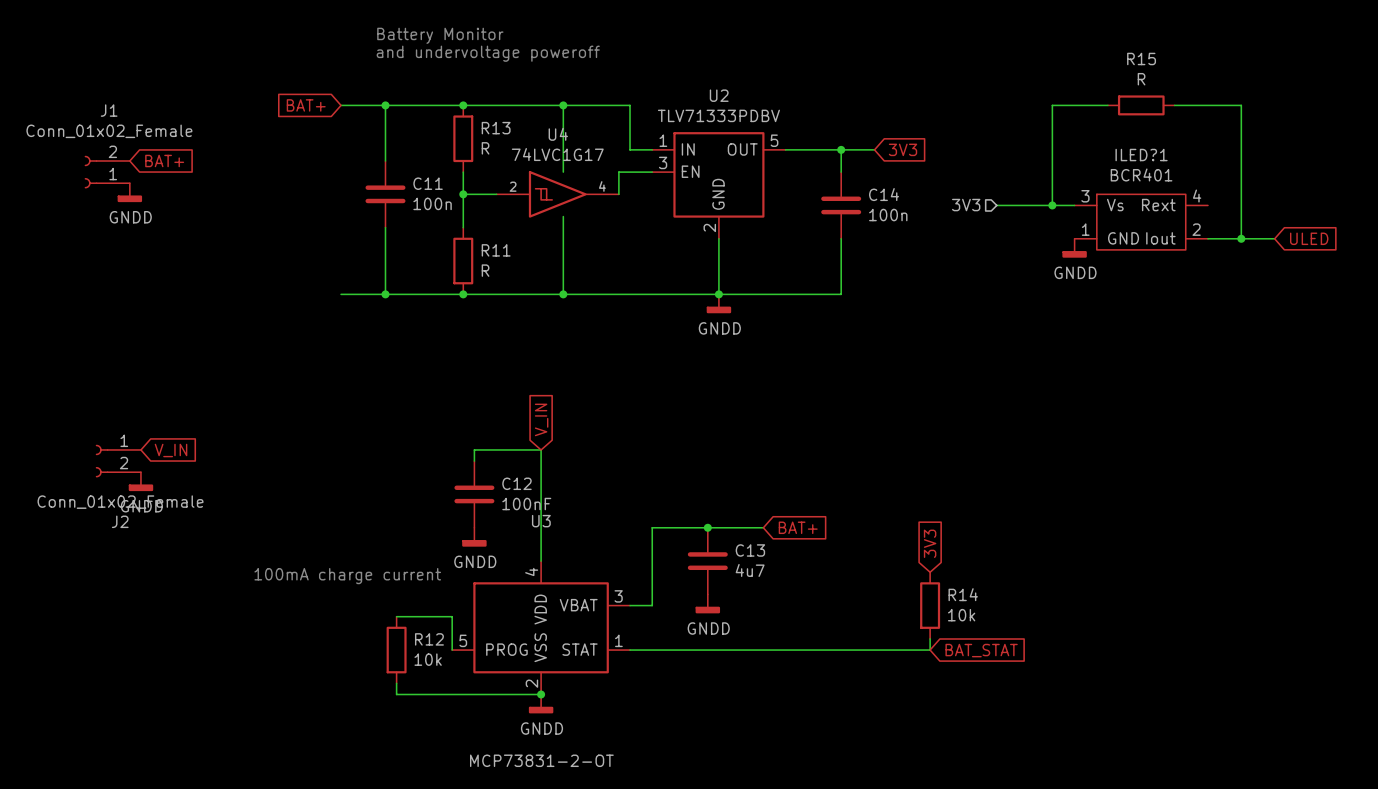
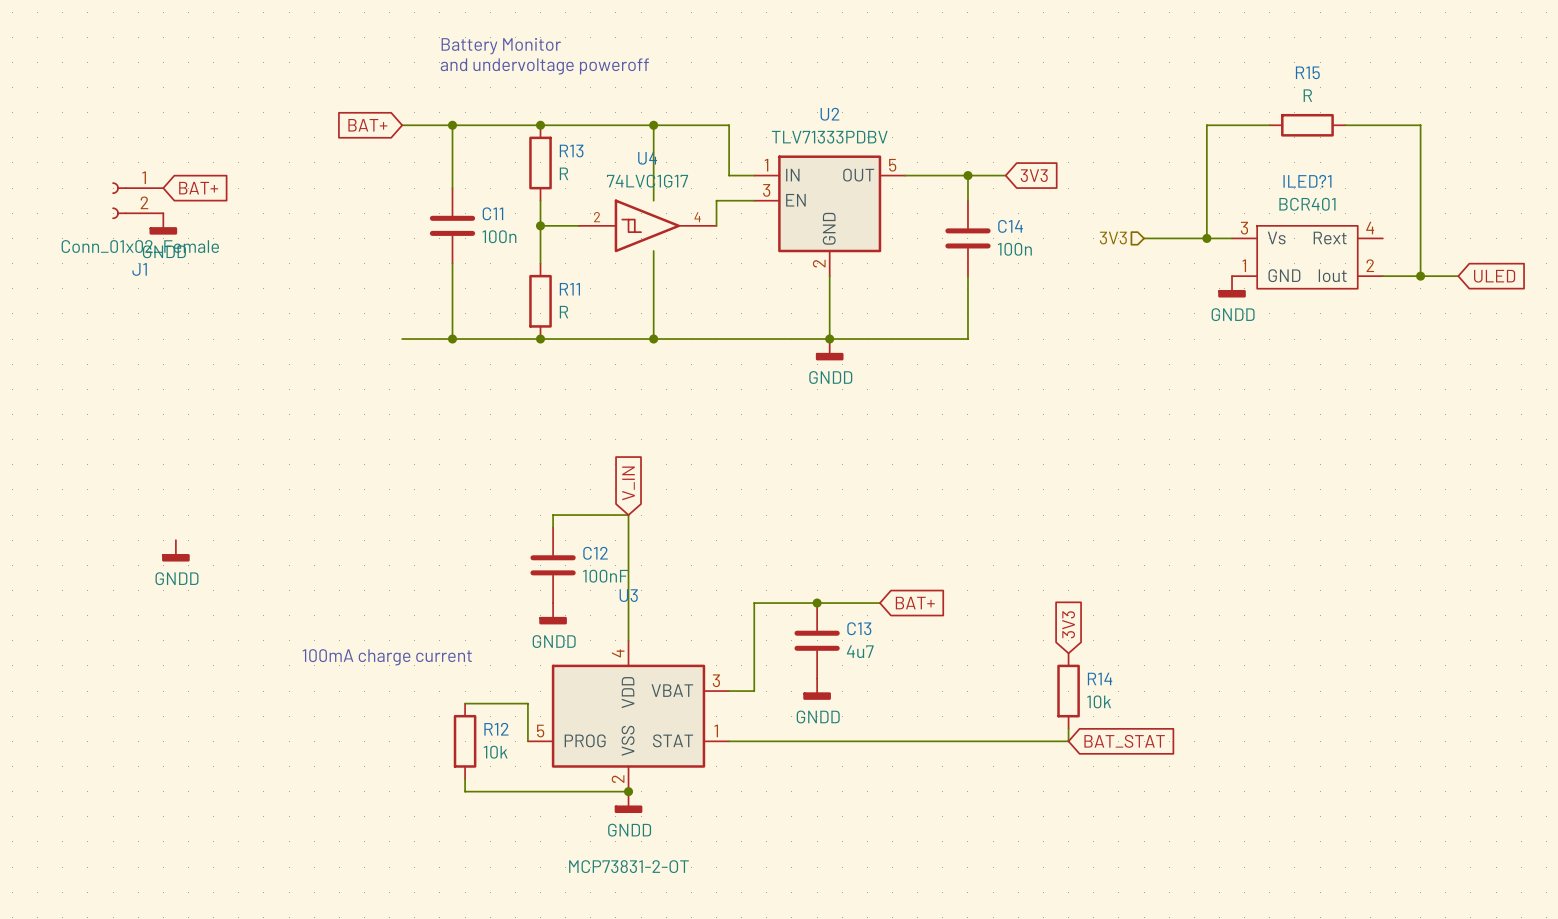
J1 flip: as is (90, 172) -> up-down (119, 200)
global label: V_IN (171, 450) -> none
J2: Conn_01x02_Female (118, 461) -> none

